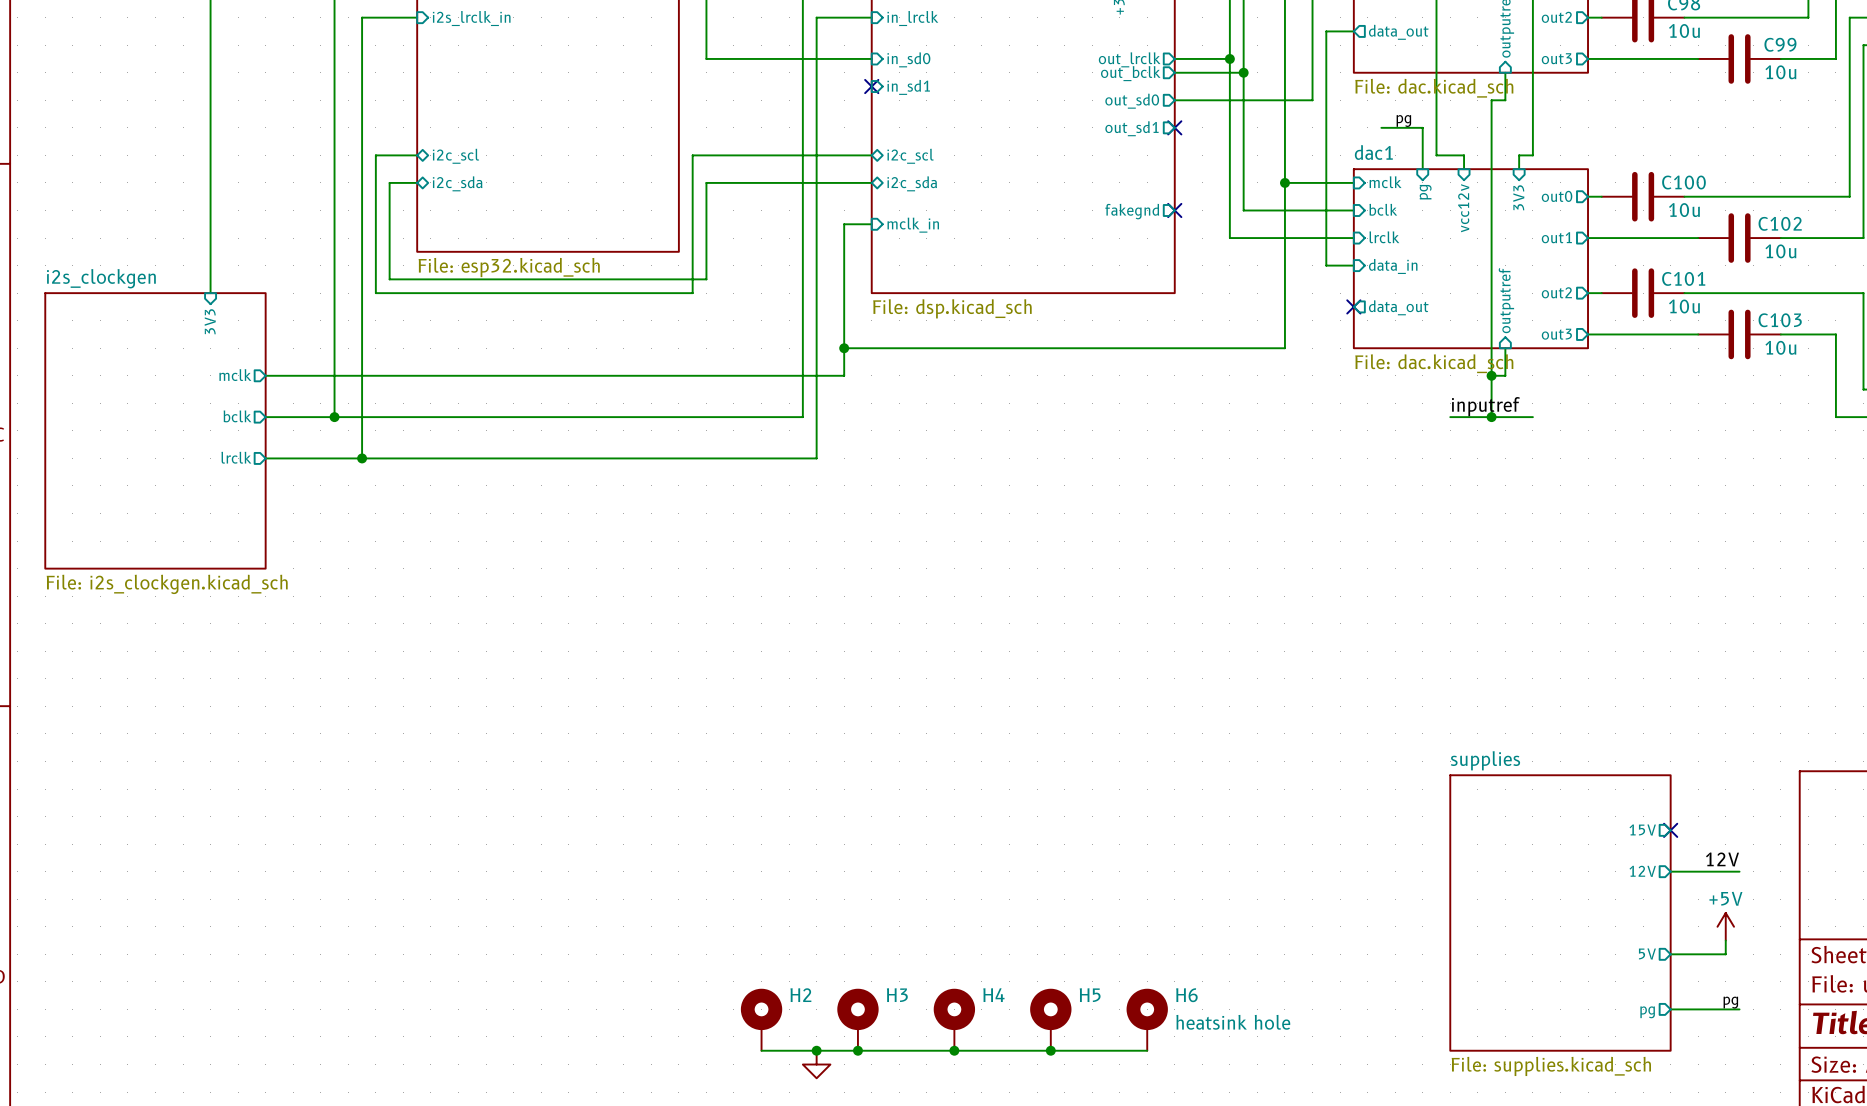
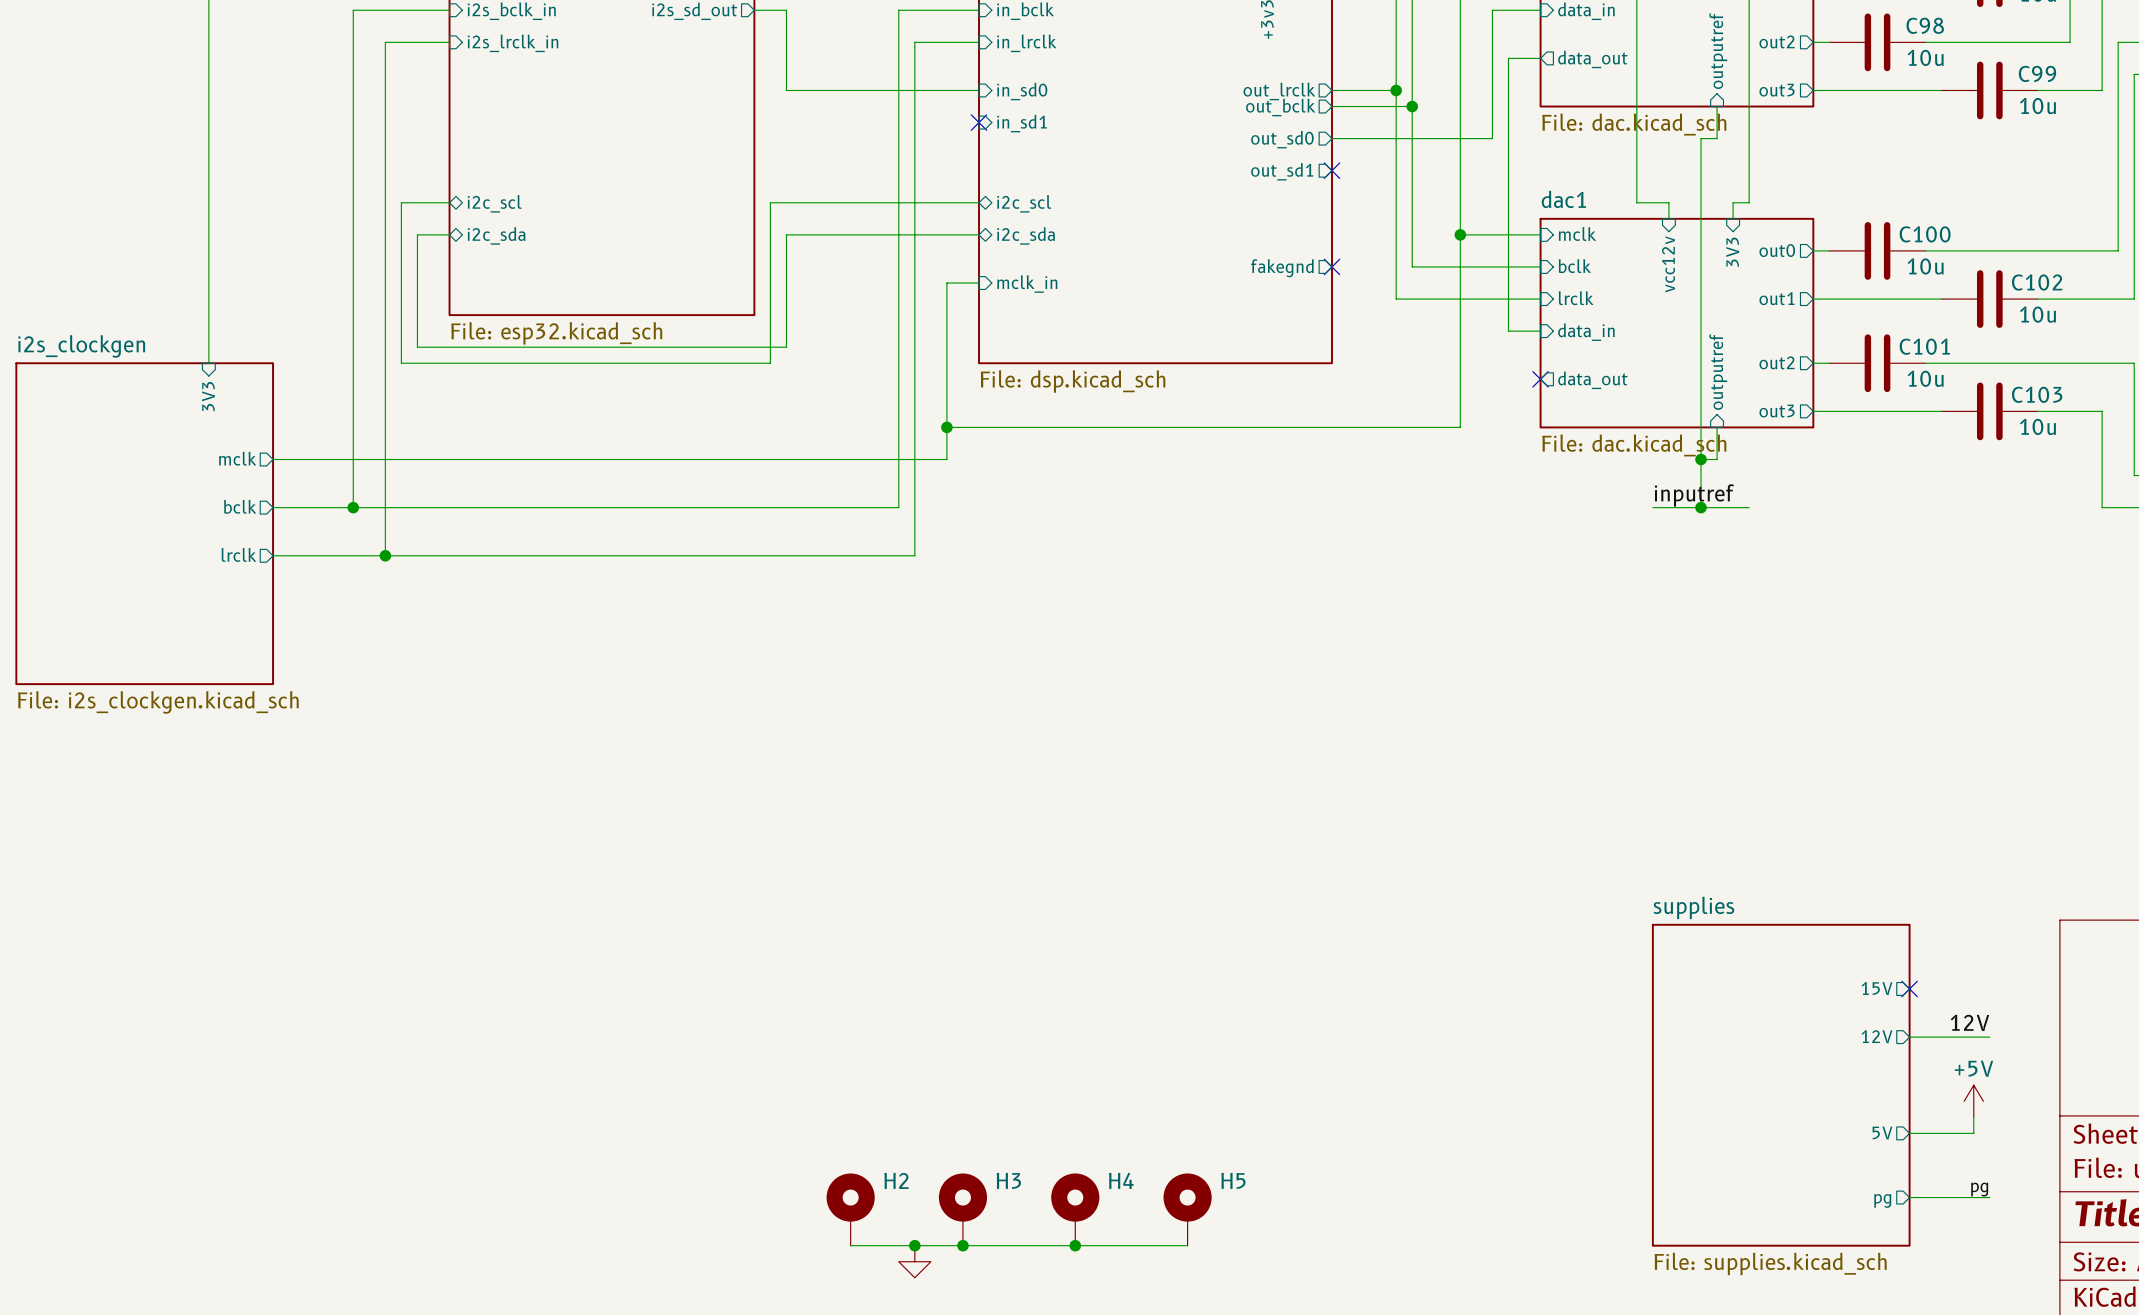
label: pg (1403, 121) -> none
wire: (1381, 127) (1422, 127) (1422, 169) -> none
sheet pin: pg (1425, 192) -> none
H6: heatsink hole (1147, 1019) -> none
wire: (1050, 1050) (1147, 1050) -> none
junction: (1050, 1050) -> none

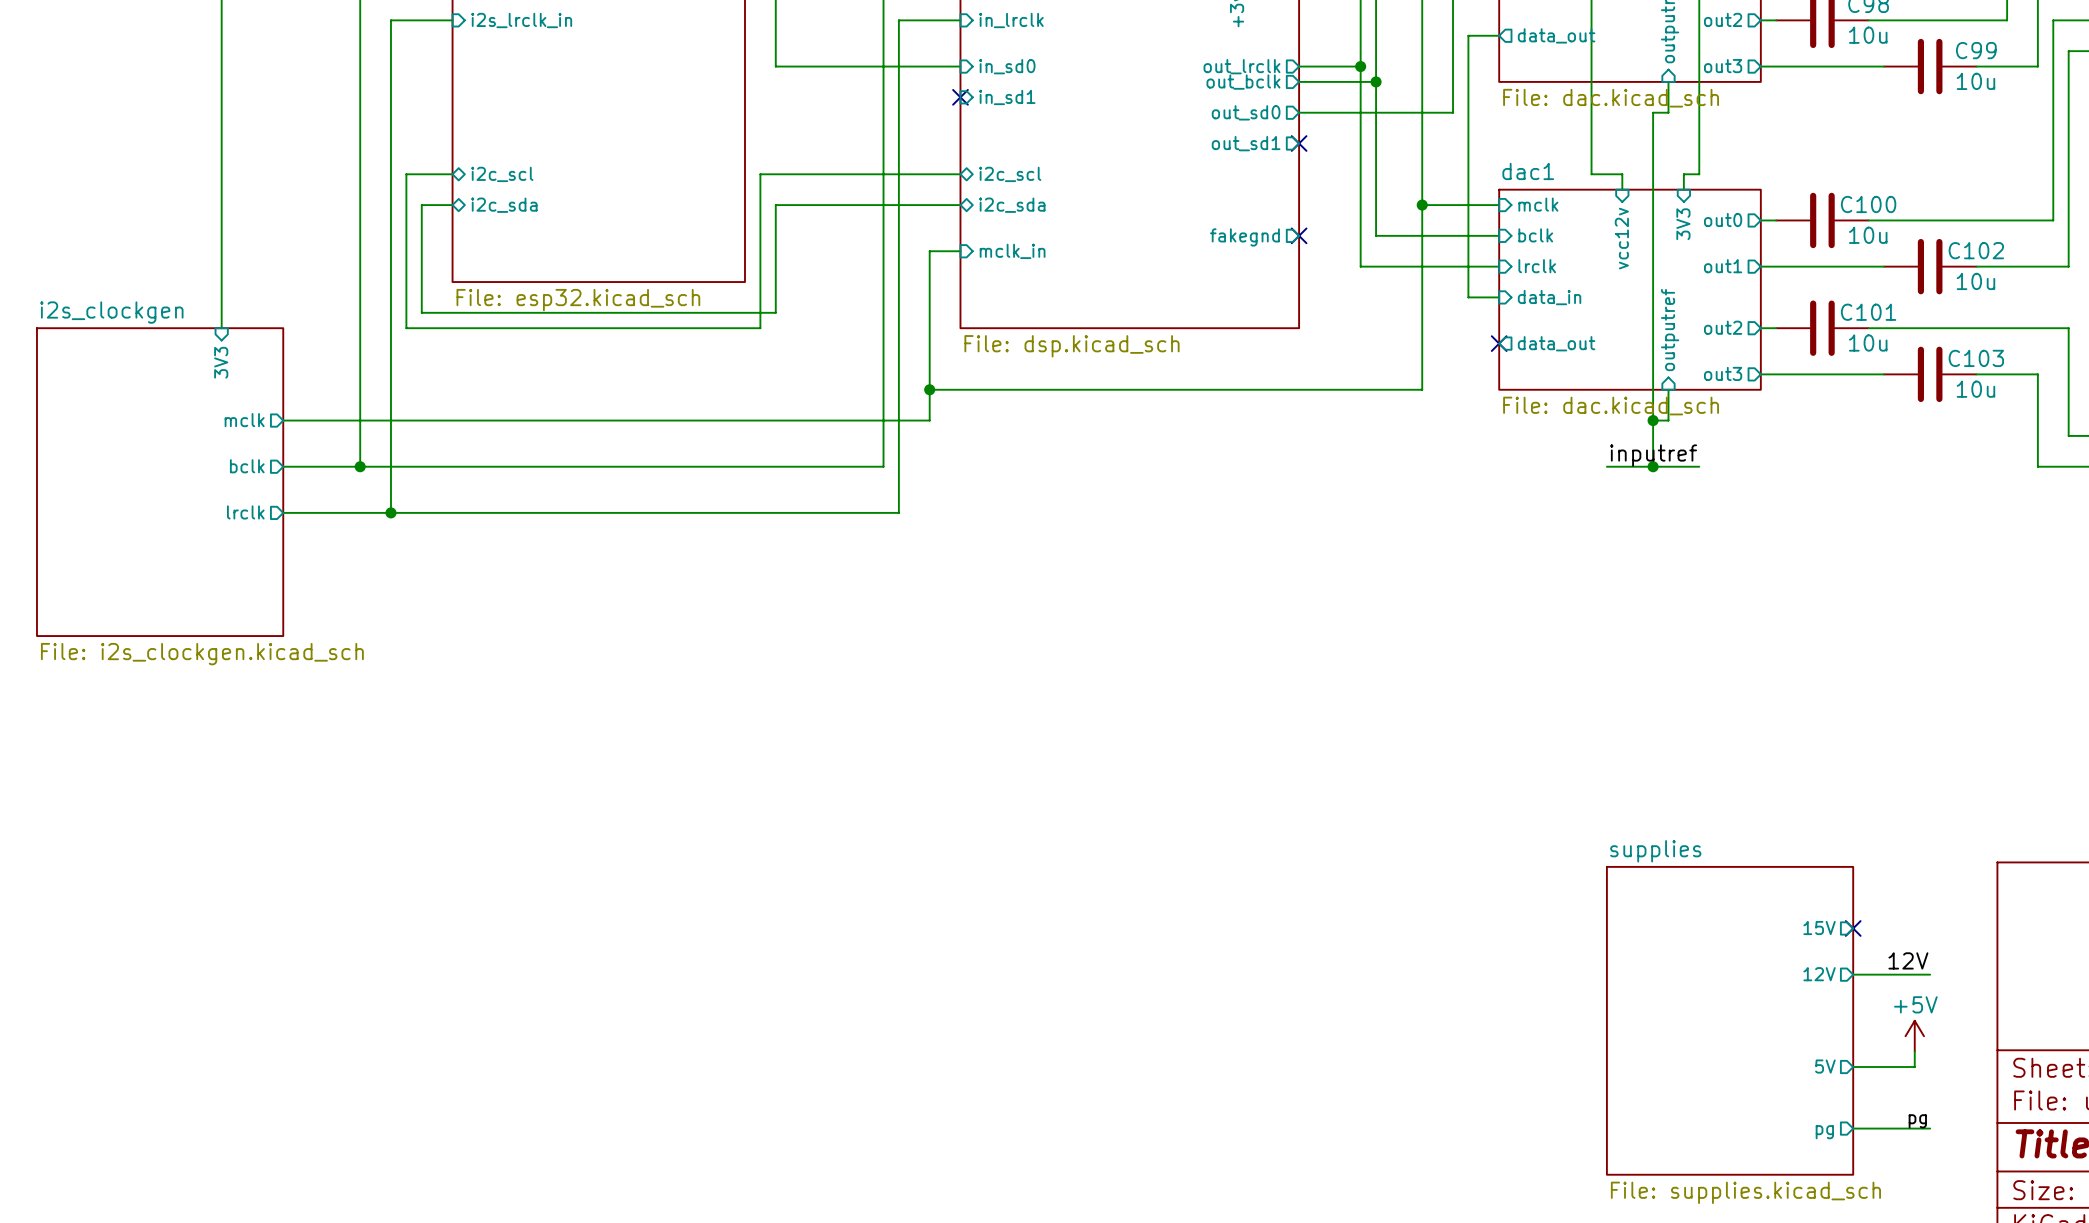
H2: (850, 1209) -> none
H3: (962, 1209) -> none
H4: (1075, 1209) -> none
H5: (1187, 1209) -> none
wire: (850, 1245) (1187, 1245) -> none
junction: (914, 1245) -> none
junction: (962, 1245) -> none
junction: (1075, 1245) -> none
power symbol: (914, 1261) -> none

